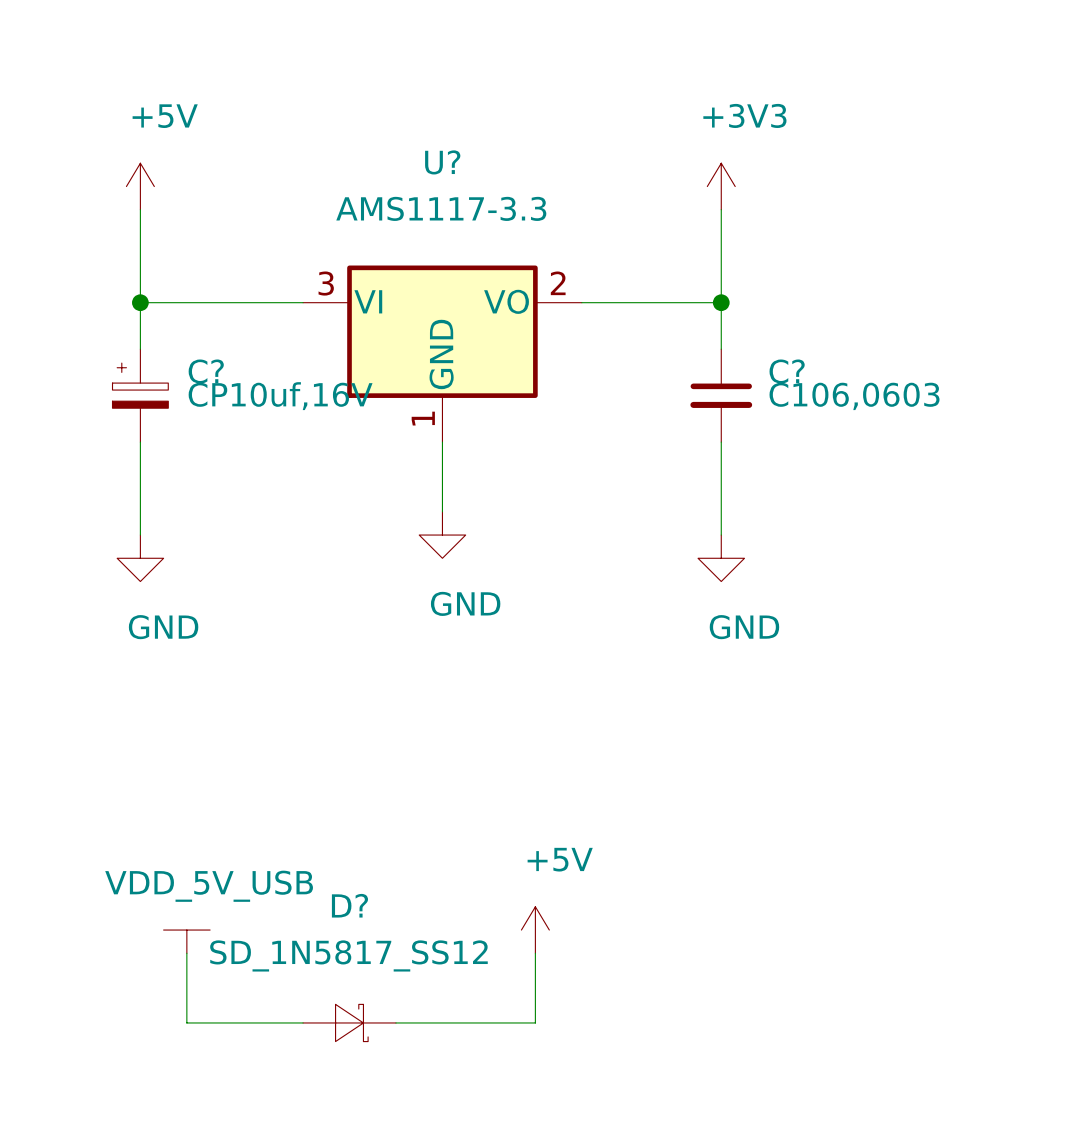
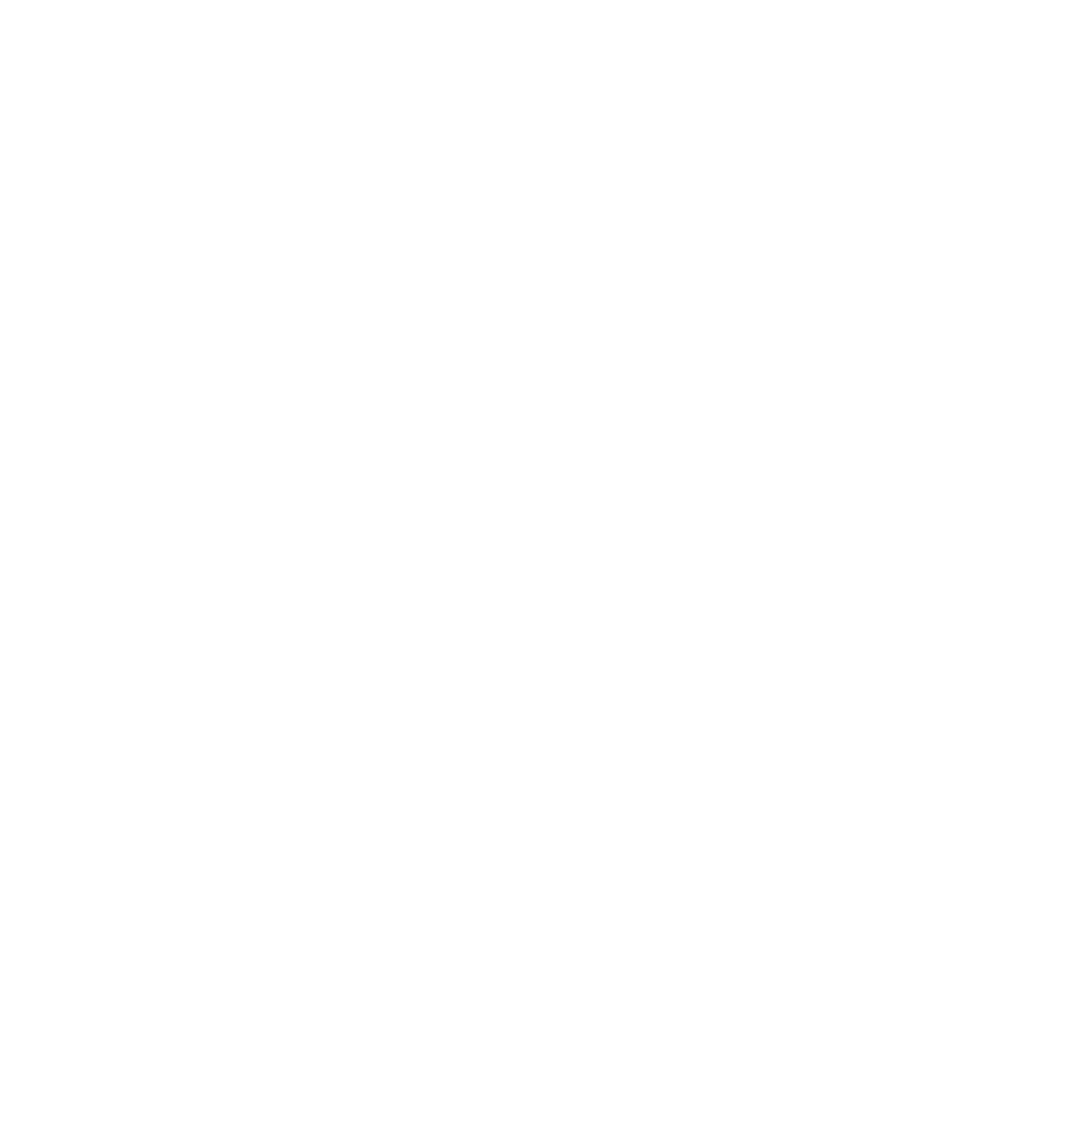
power symbol: +5V (140, 186) -> none
power symbol: +3V3 (721, 186) -> none
wire: (140, 209) (140, 349) -> none
wire: (721, 209) (721, 349) -> none
wire: (140, 302) (303, 302) -> none
junction: (140, 302) -> none
wire: (581, 302) (721, 302) -> none
junction: (721, 302) -> none
U?: AMS1117-3.3 (442, 353) -> none
C?: CP10uf,16V (140, 395) -> none
C?: C106,0603 (721, 395) -> none
wire: (140, 442) (140, 535) -> none
wire: (442, 442) (442, 511) -> none
wire: (721, 442) (721, 535) -> none
power symbol: GND (442, 535) -> none
power symbol: GND (140, 558) -> none
power symbol: GND (721, 558) -> none
power symbol: +5V (535, 930) -> none
power symbol: VDD_5V_USB (186, 941) -> none
wire: (186, 953) (186, 1022) (303, 1022) -> none
wire: (535, 953) (535, 1022) (395, 1022) -> none
D?: SD_1N5817_SS12 (349, 1022) -> none

